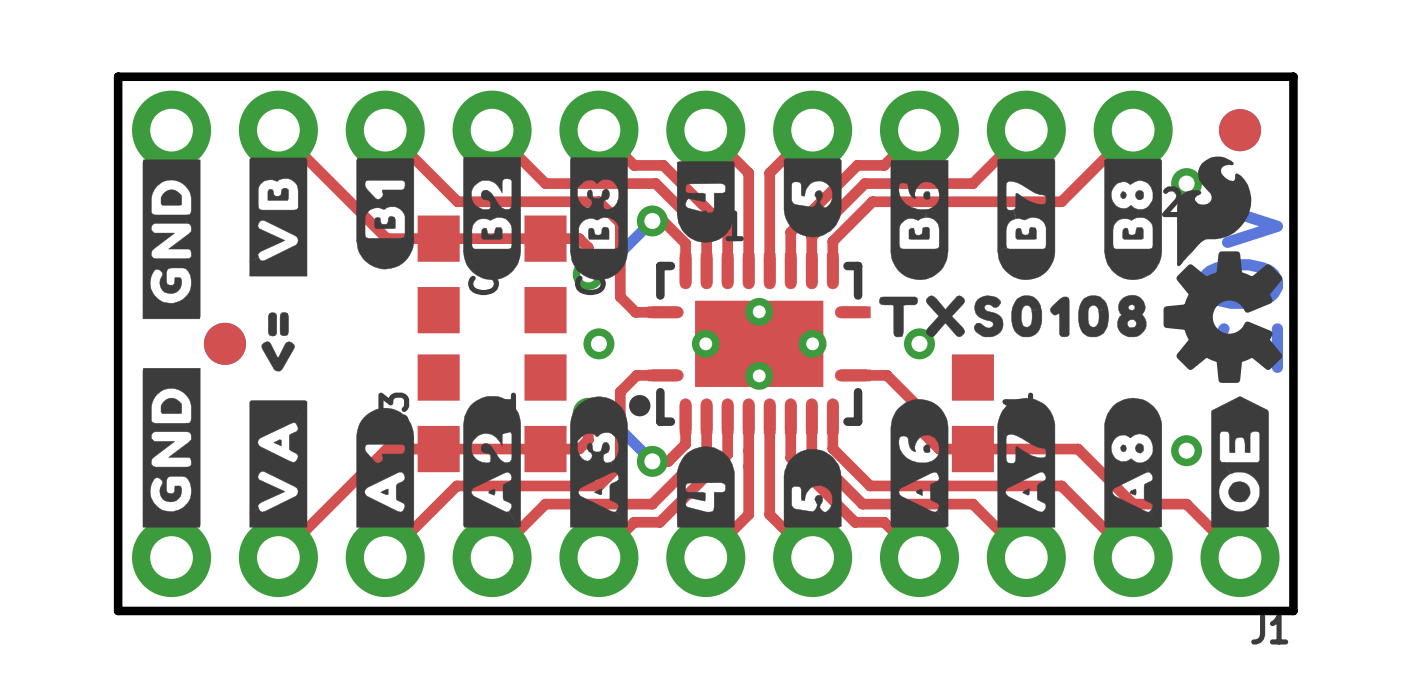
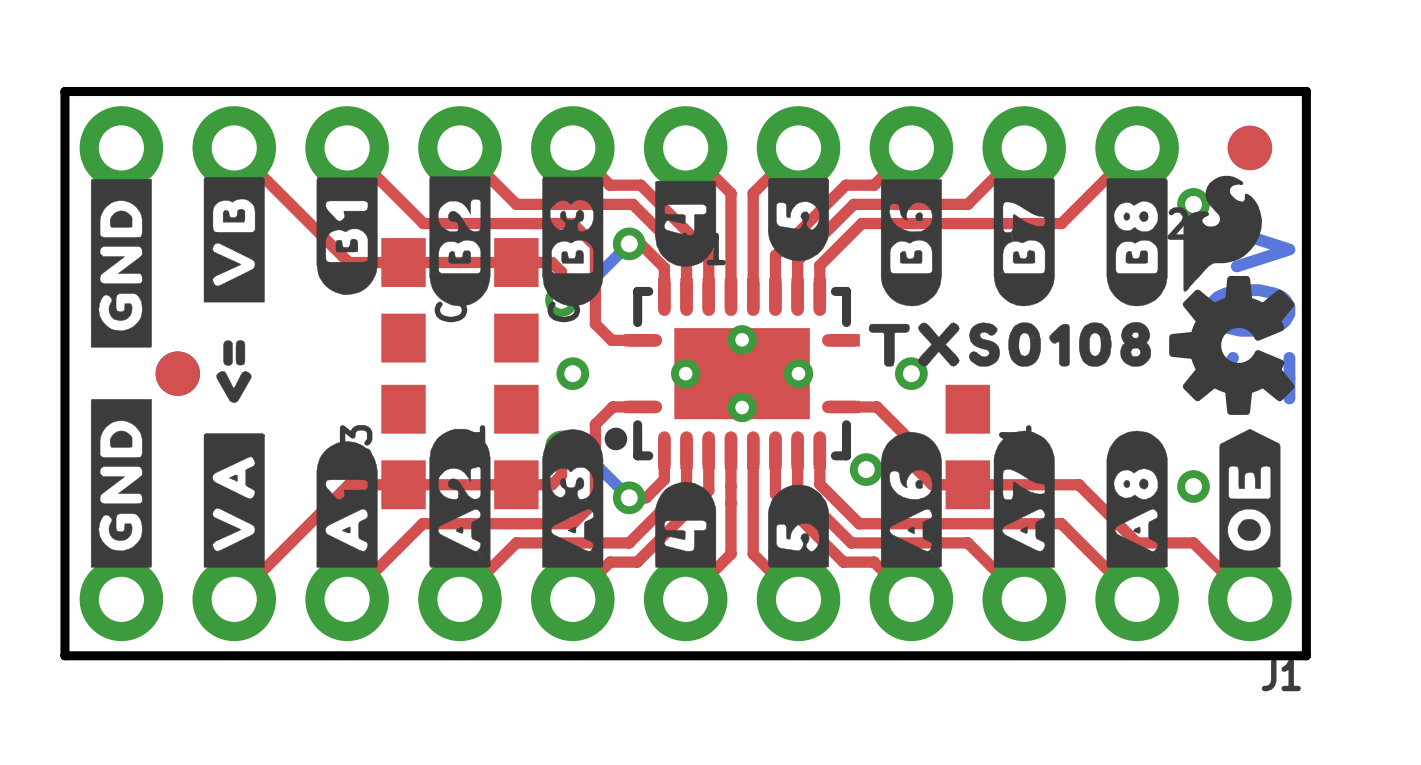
via: none -> (866, 469)

